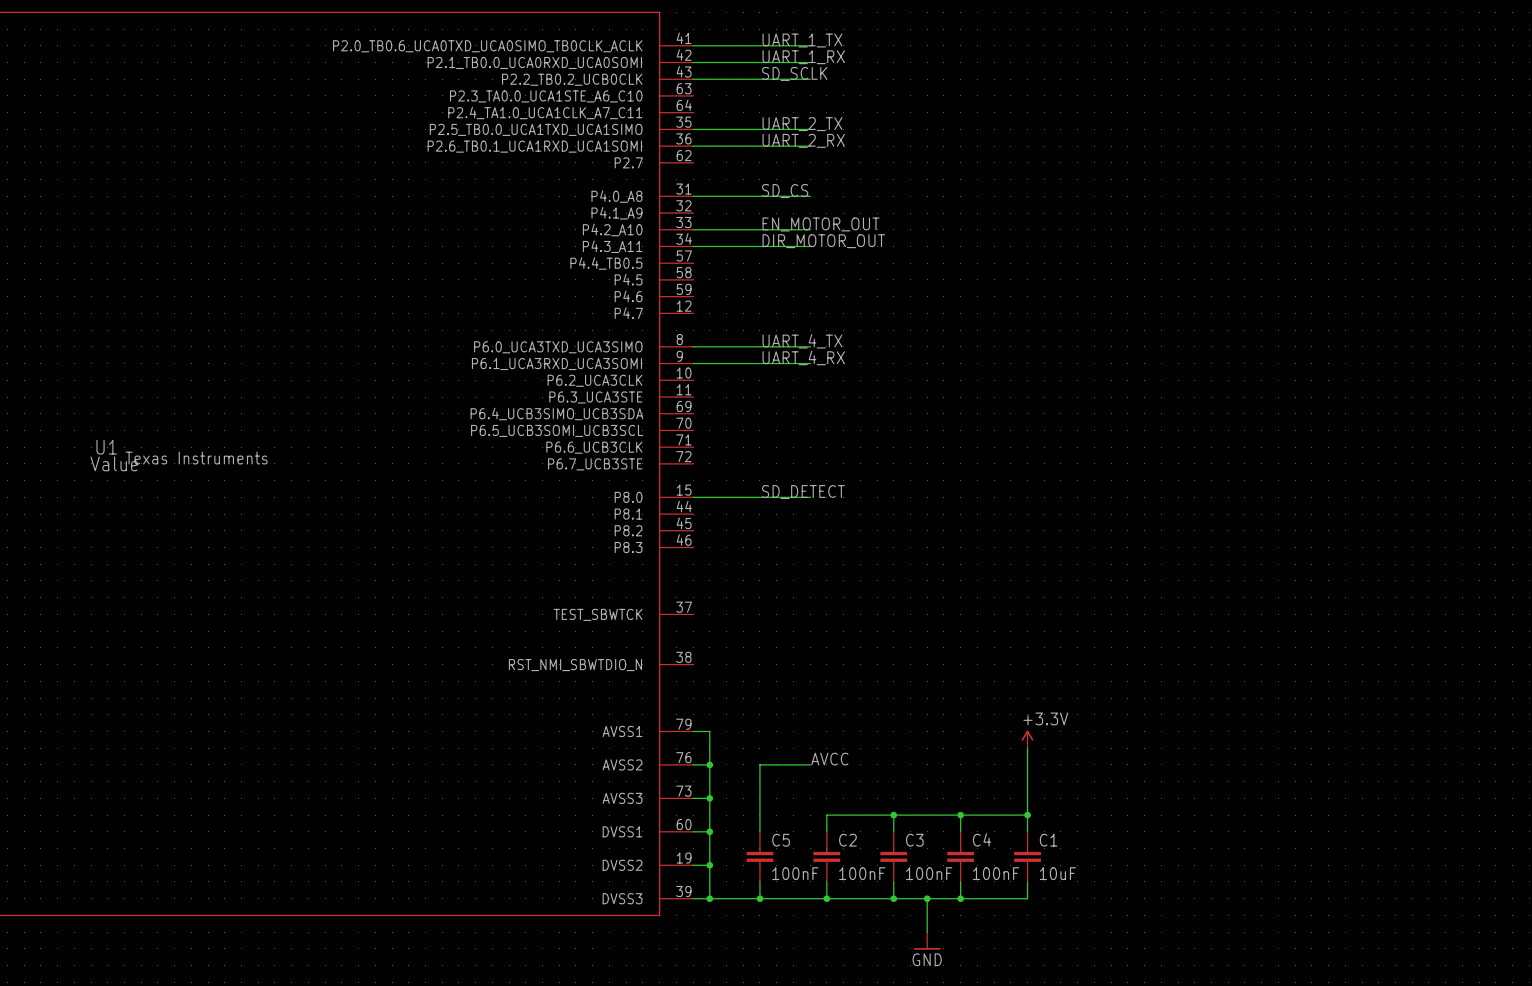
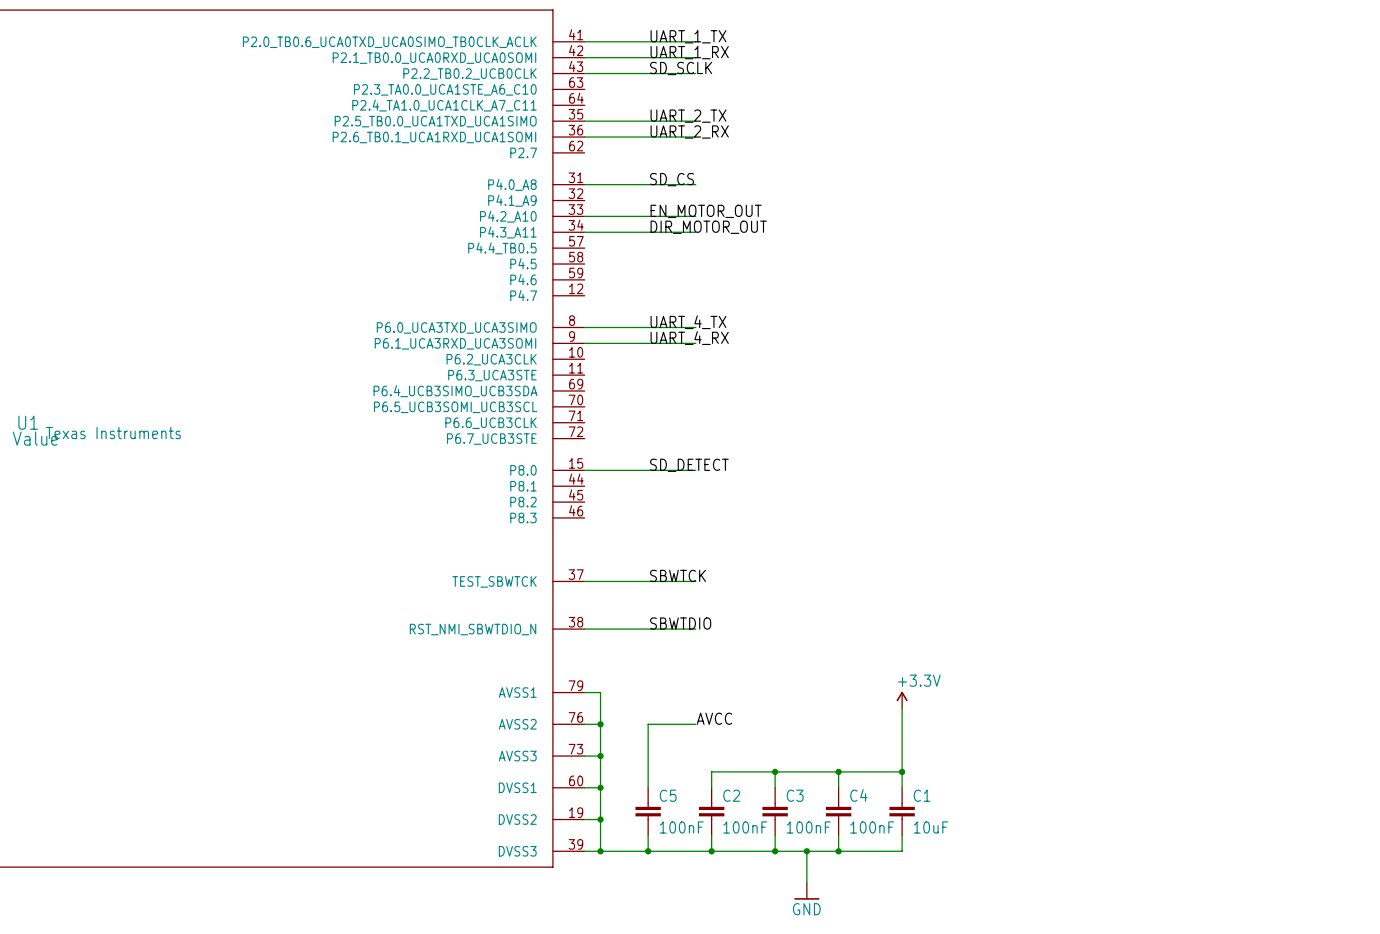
label: none -> SBWTCK (678, 575)
wire: none -> (584, 581) (695, 581)
label: none -> SBWTDIO (680, 623)
wire: none -> (584, 629) (695, 629)

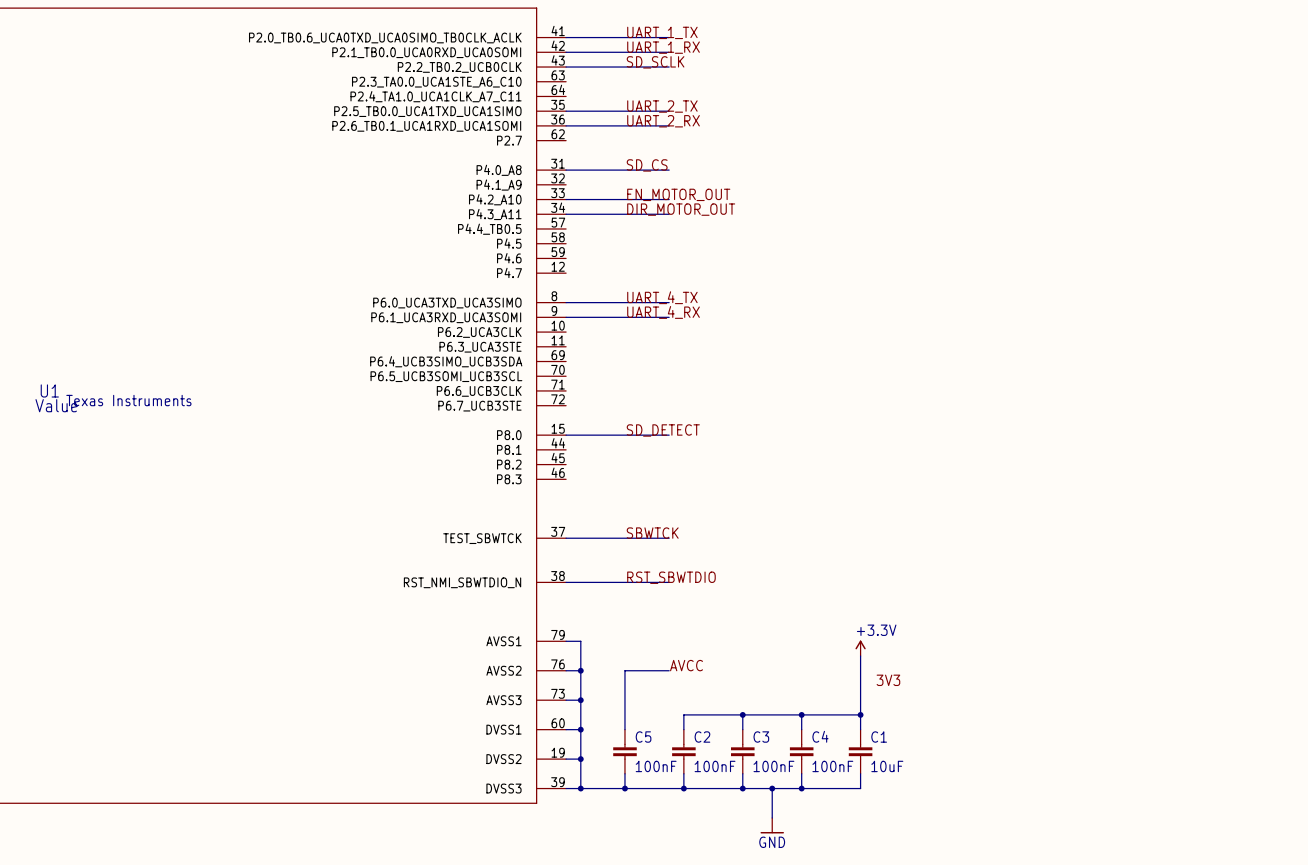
label: SBWTDIO (680, 623) -> RST_SBWTDIO (671, 577)
label: none -> 3V3 (888, 680)

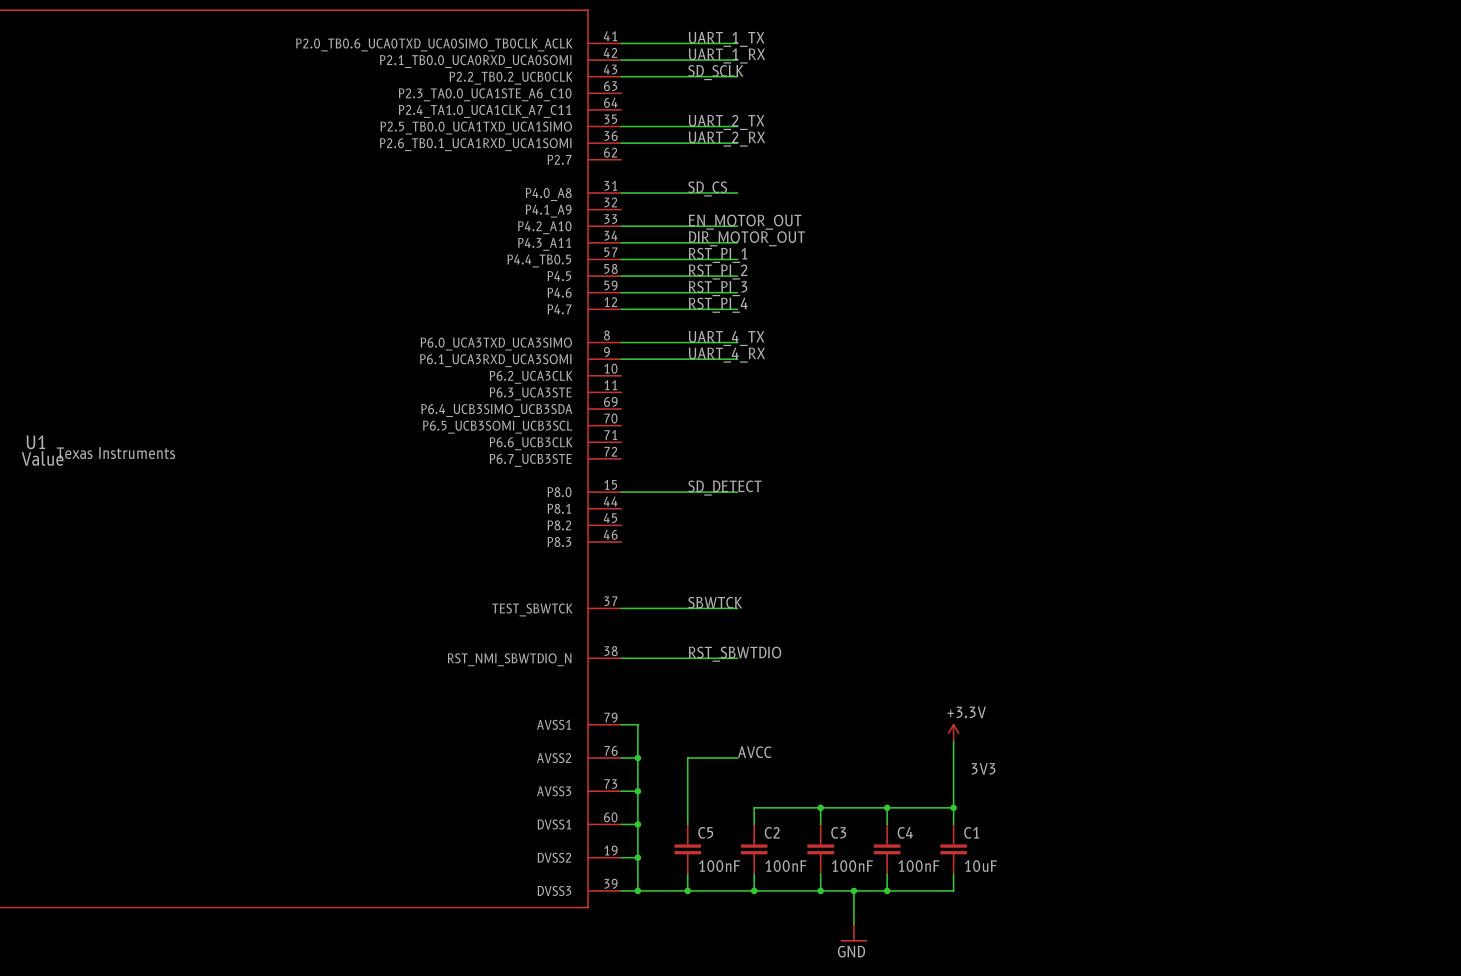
label: none -> RST_PI_1 (718, 255)
wire: none -> (621, 259) (737, 259)
label: none -> RST_PI_2 (718, 272)
wire: none -> (621, 276) (737, 276)
label: none -> RST_PI_3 (718, 288)
wire: none -> (621, 292) (737, 292)
label: none -> RST_PI_4 (718, 305)
wire: none -> (621, 309) (737, 309)

